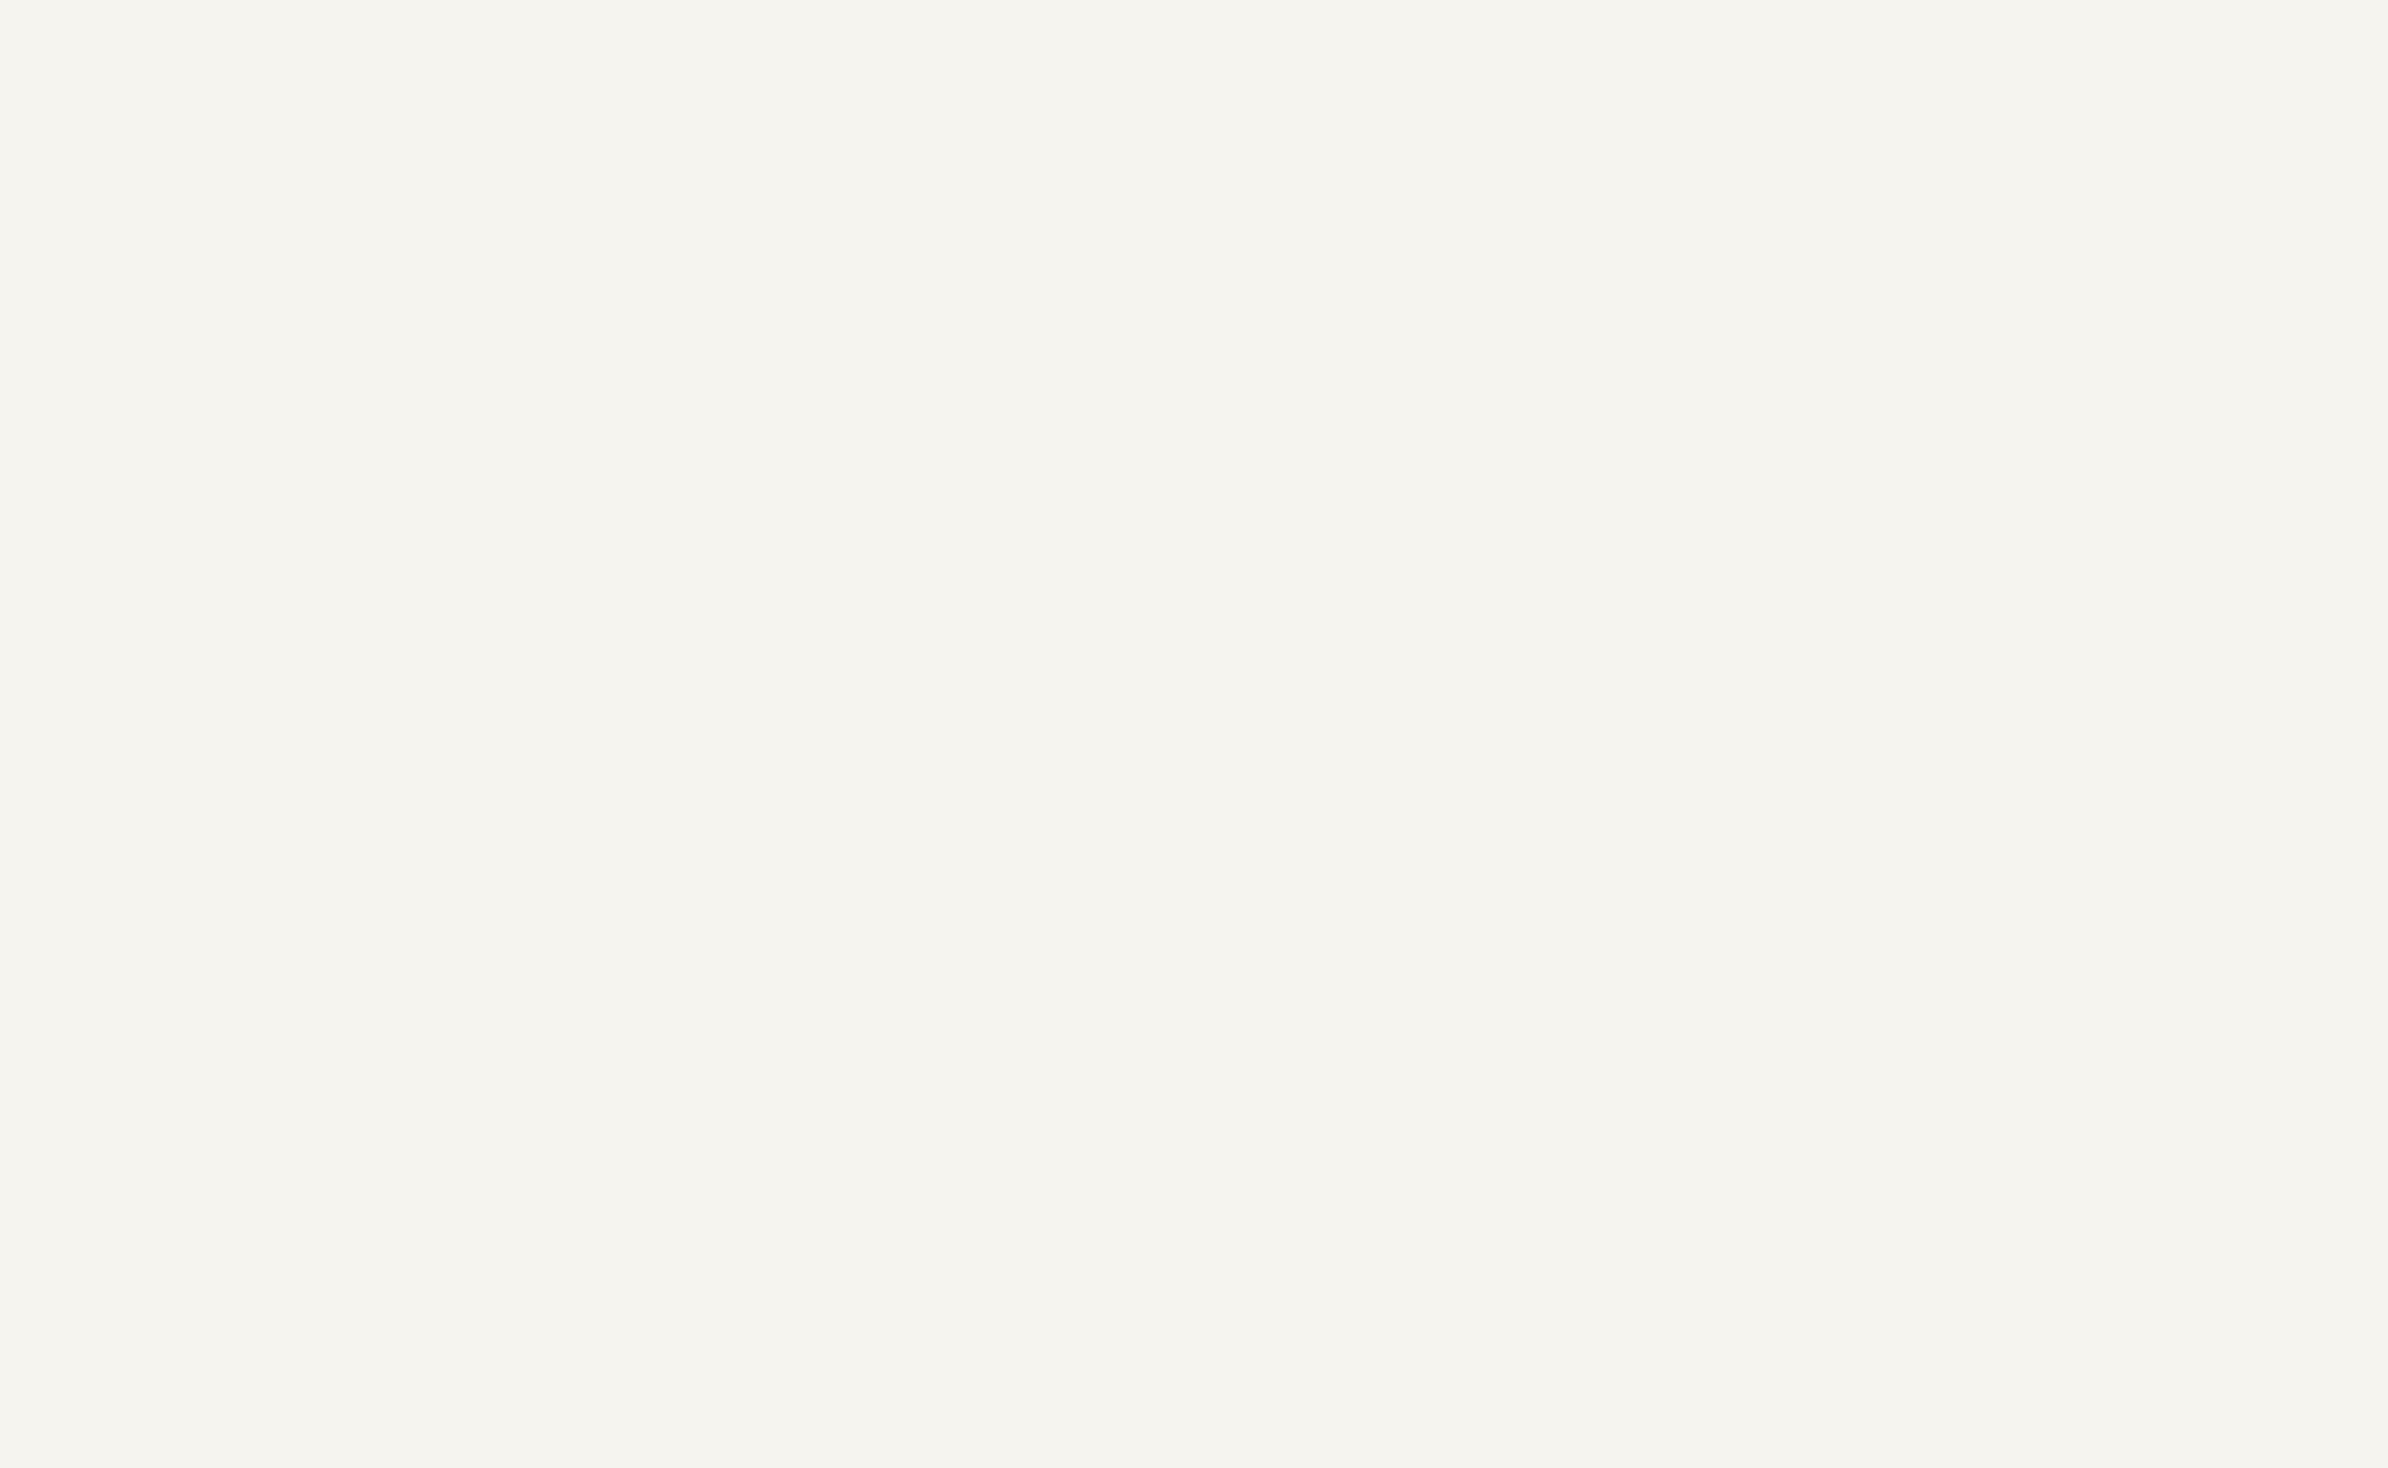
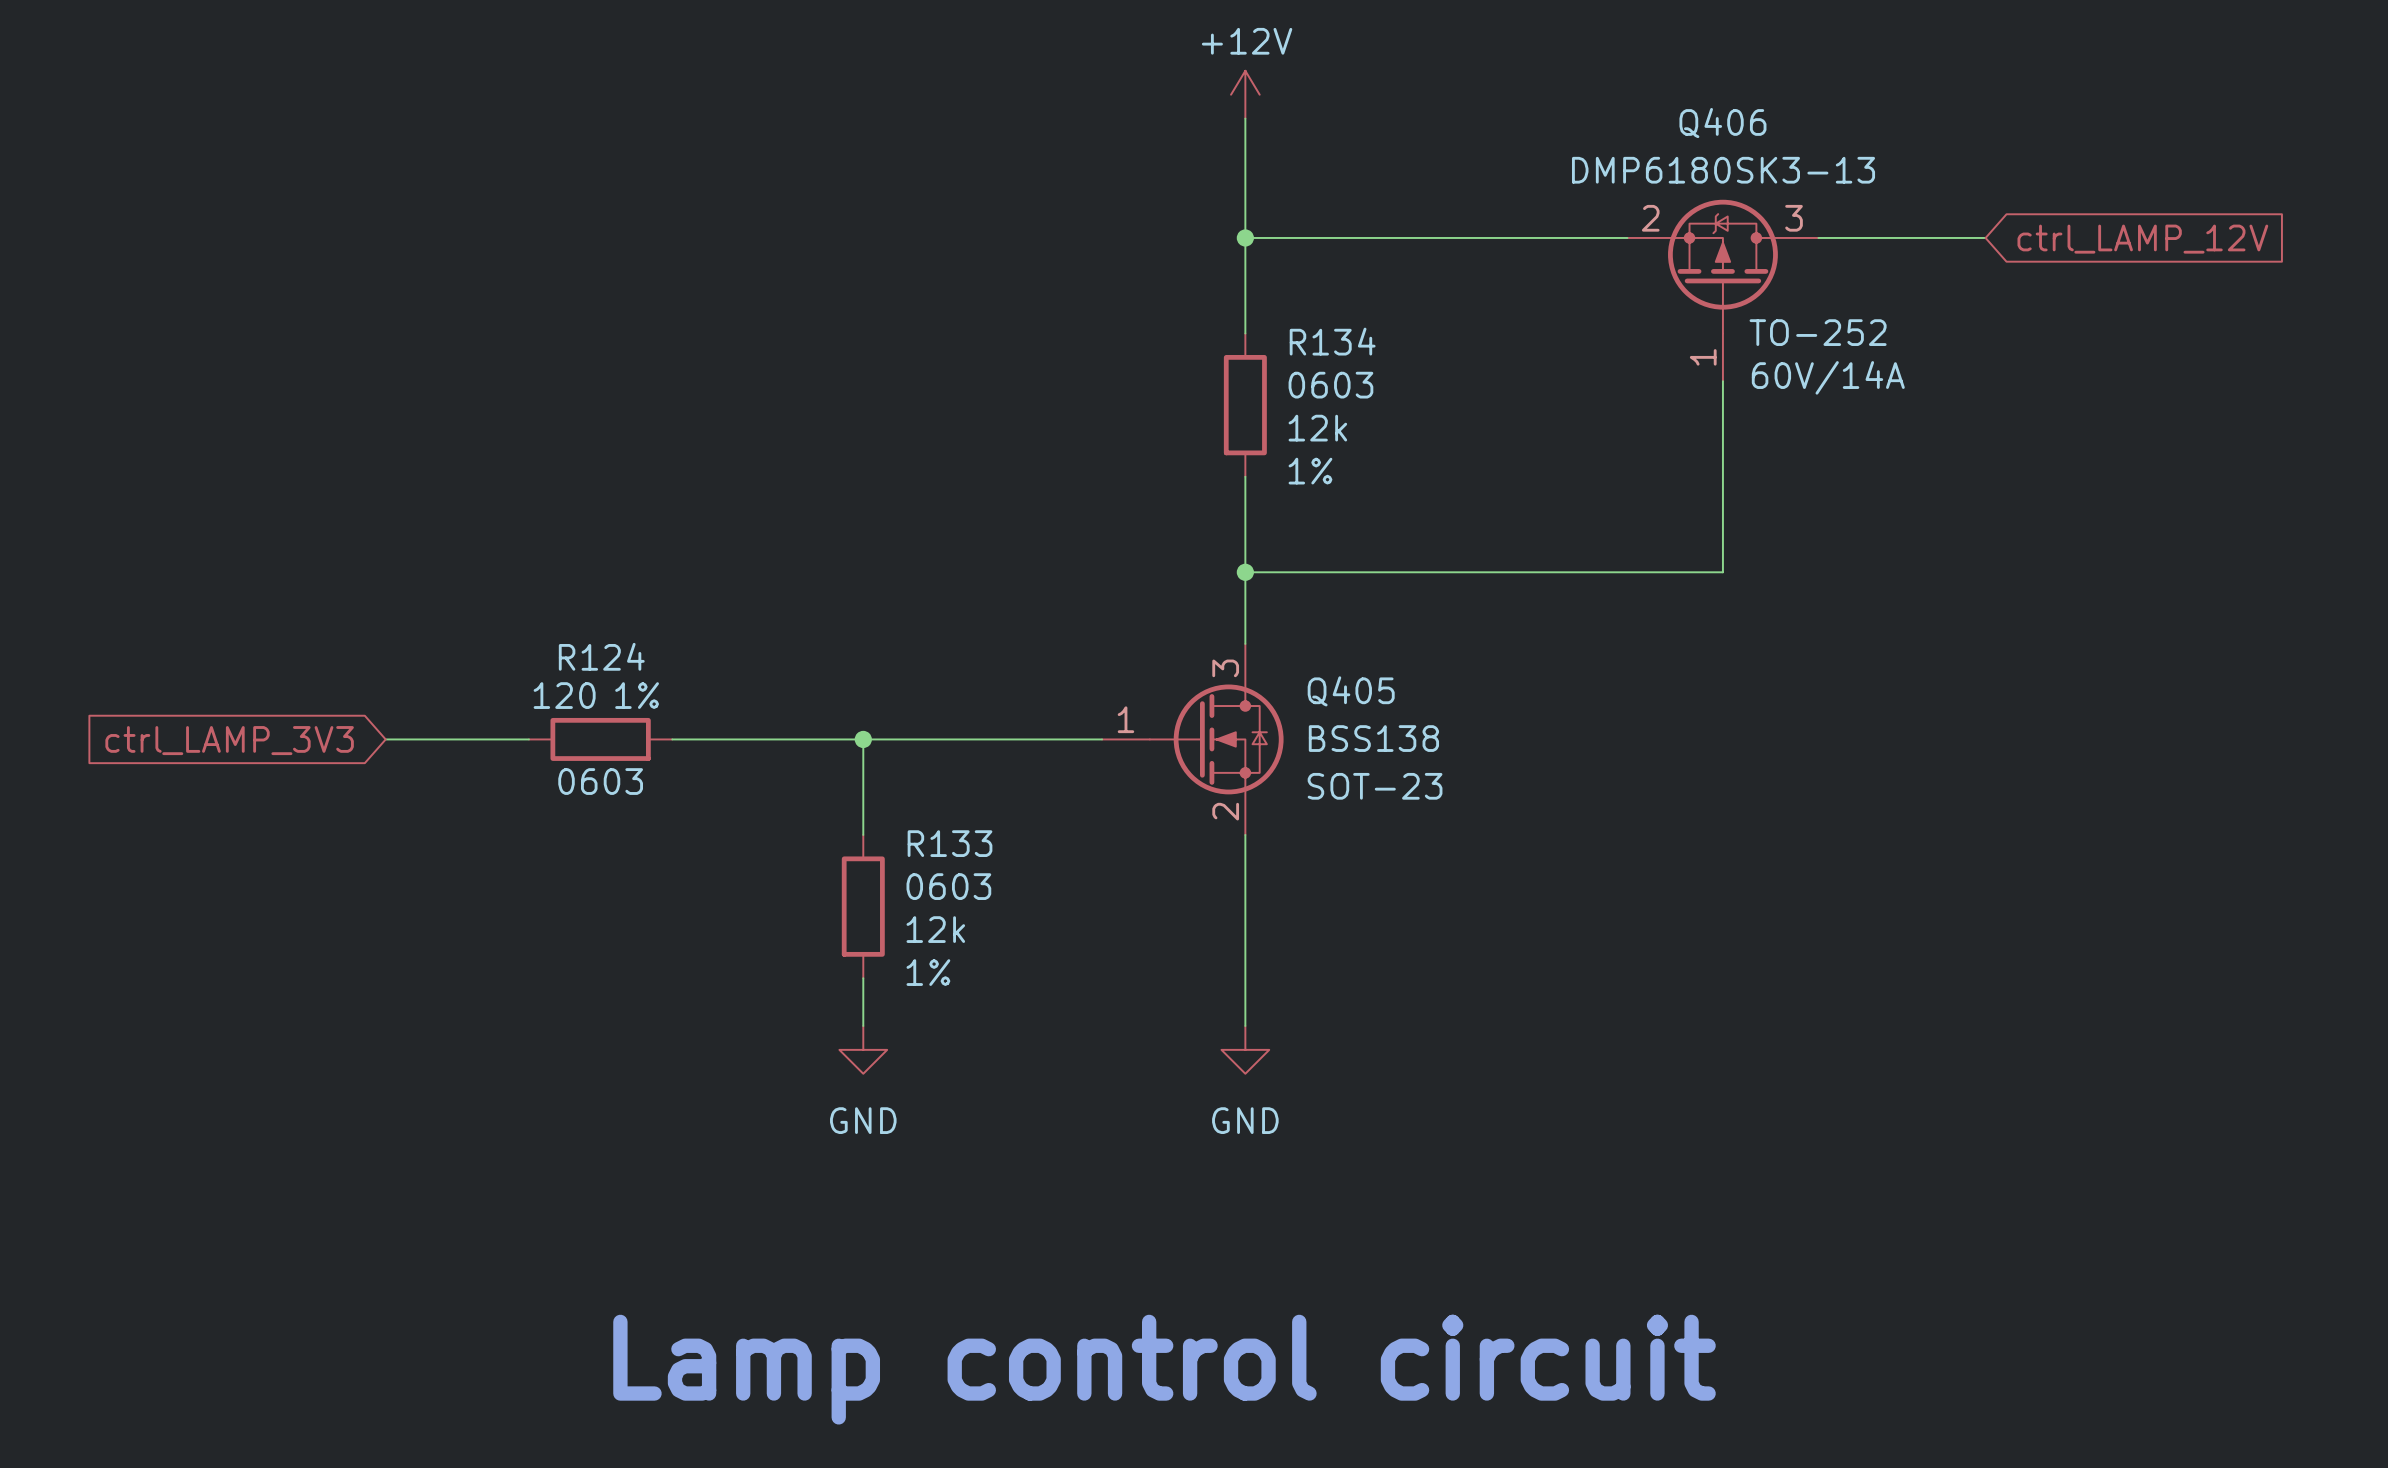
power symbol: none -> +12V (1245, 94)
wire: none -> (1245, 118) (1245, 333)
wire: none -> (1245, 237) (1627, 237)
junction: none -> (1245, 237)
wire: none -> (1818, 237) (1985, 237)
global label: none -> ctrl_LAMP_12V (2142, 239)
Q406: none -> DMP6180SK3-13 (1722, 290)
wire: none -> (1722, 381) (1722, 572) (1245, 572)
R134: none -> 12k (1245, 405)
wire: none -> (1245, 476) (1245, 643)
junction: none -> (1245, 572)
wire: none -> (385, 739) (528, 739)
R124: none -> 120 (600, 739)
wire: none -> (672, 739) (1102, 739)
wire: none -> (863, 739) (863, 834)
junction: none -> (863, 739)
Q405: none -> BSS138 (1192, 739)
global label: none -> ctrl_LAMP_3V3 (229, 740)
wire: none -> (1245, 834) (1245, 1025)
R133: none -> 12k (863, 906)
wire: none -> (863, 978) (863, 1025)
power symbol: none -> GND (863, 1049)
power symbol: none -> GND (1245, 1049)
text: none -> Lamp control circuit (1164, 1369)

